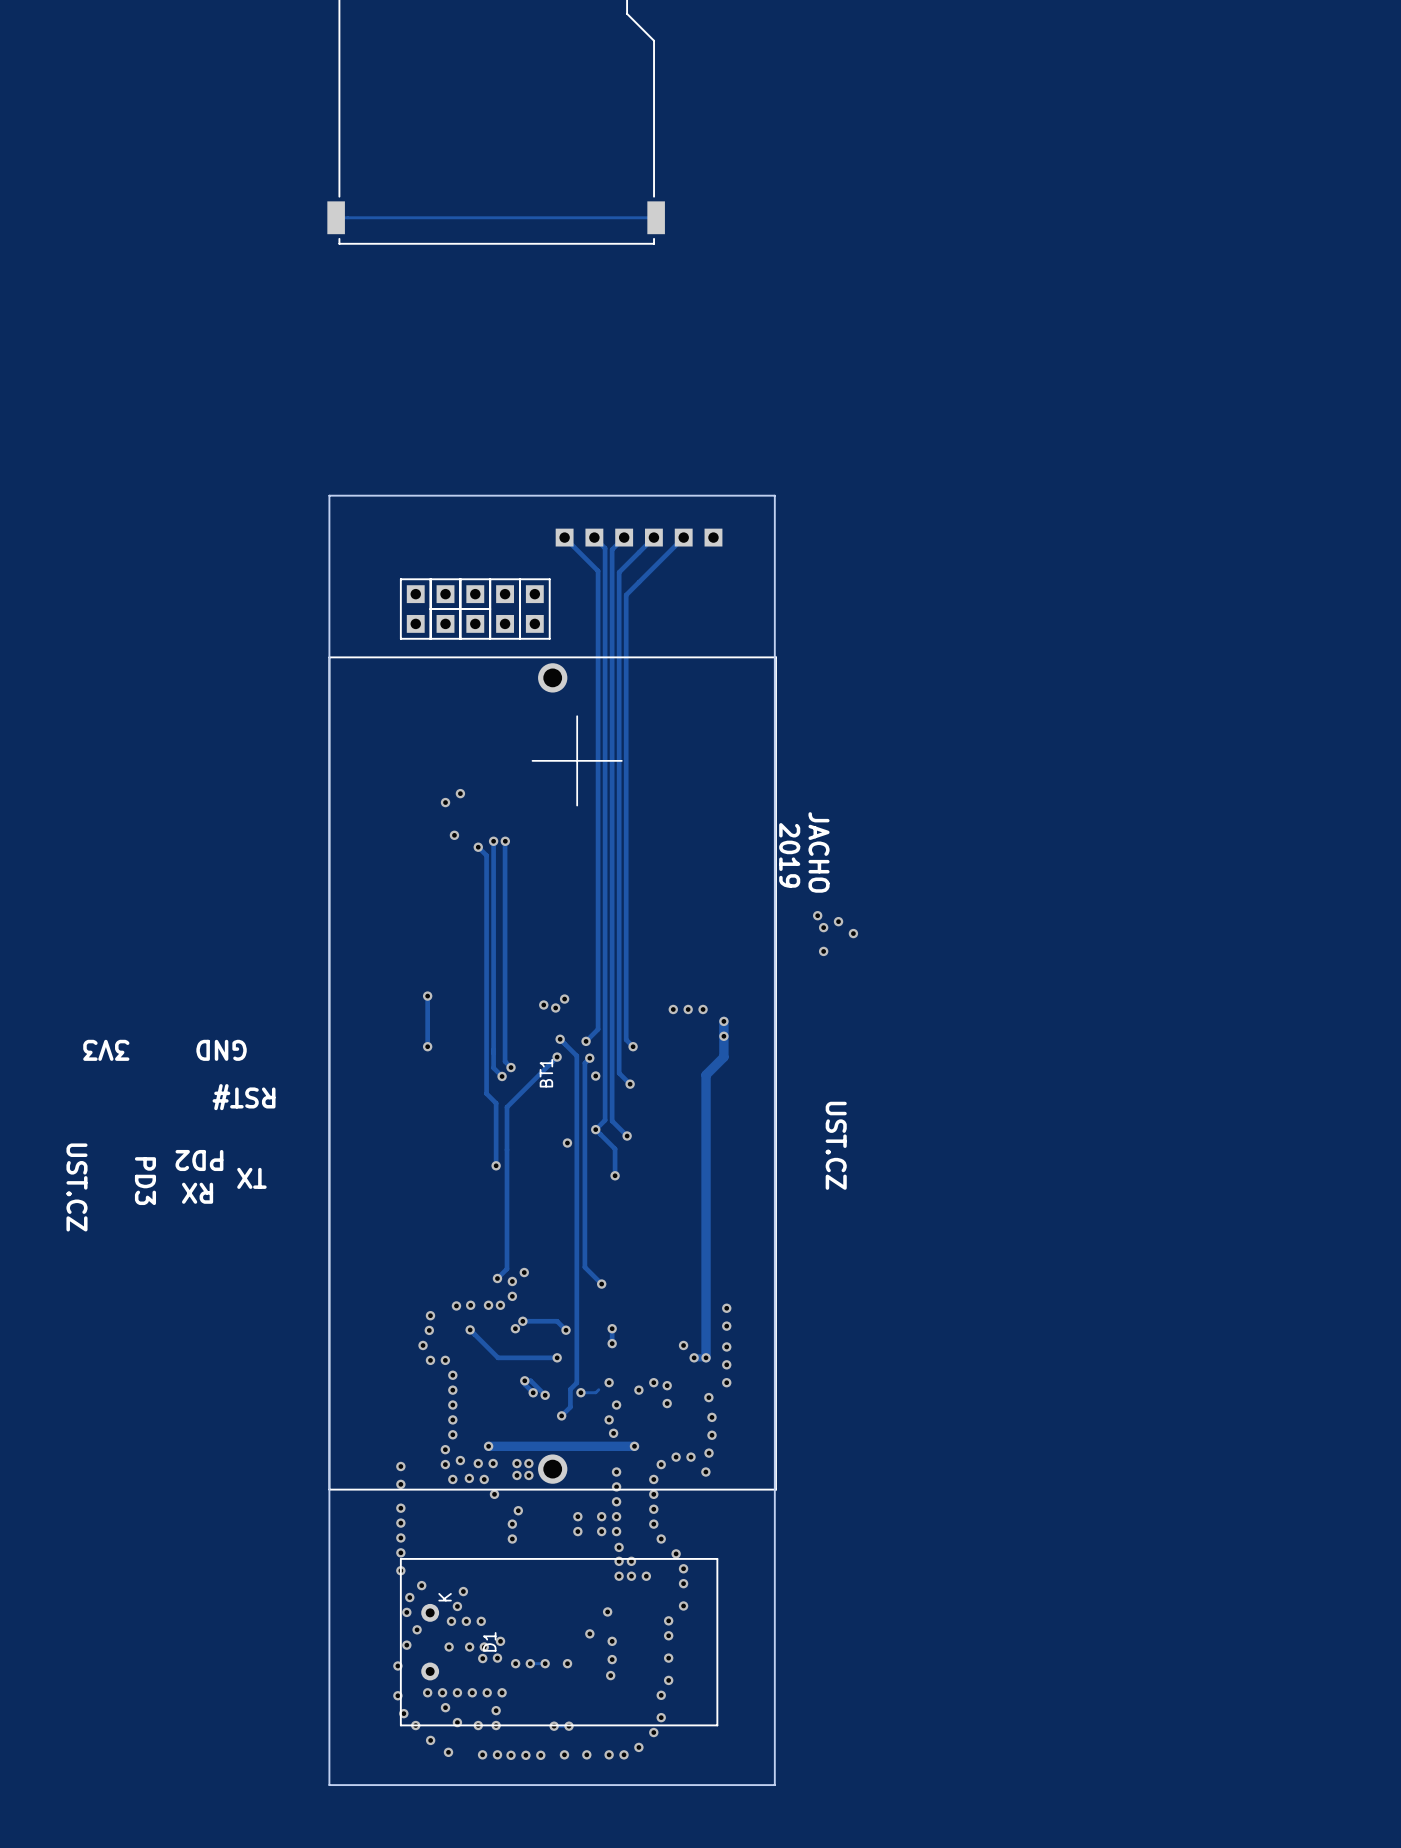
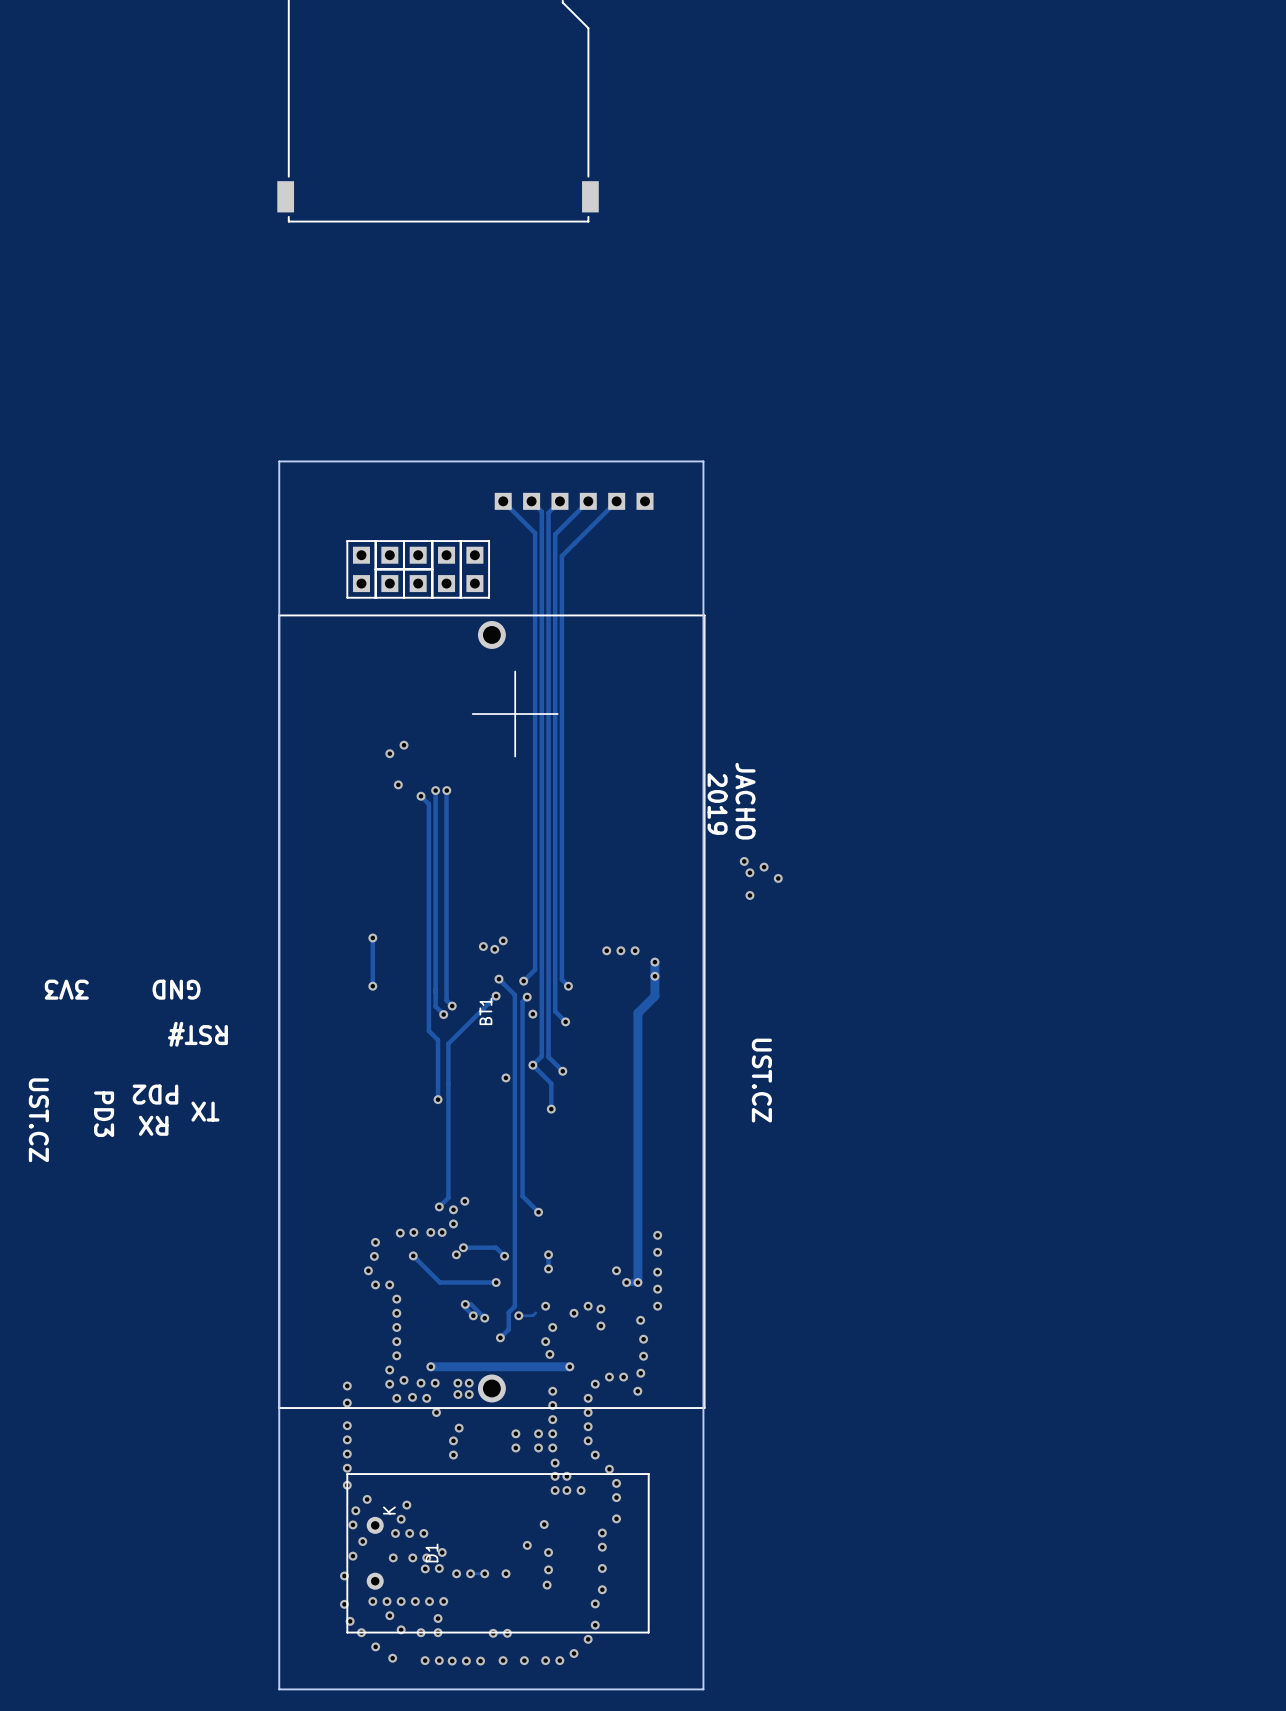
track: (336, 217) (656, 217) -> none

